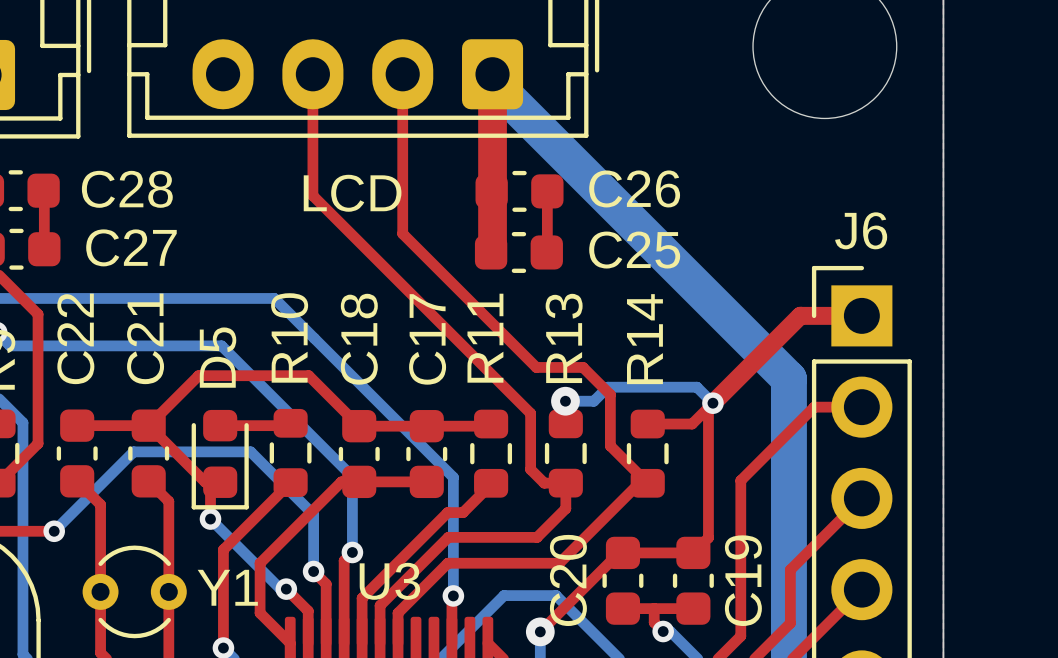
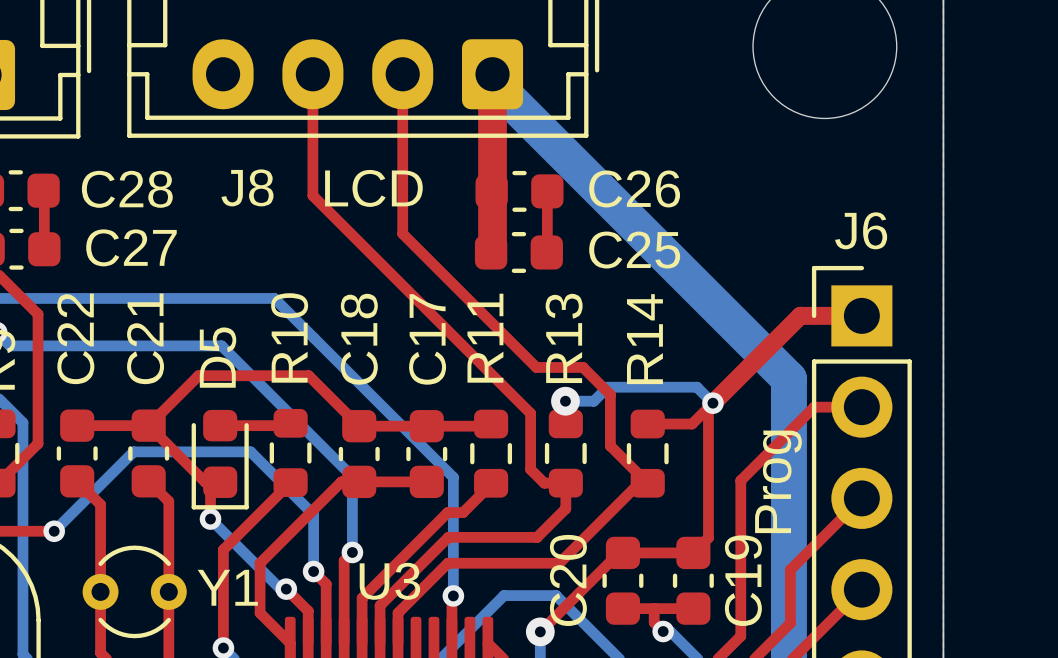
text: none -> LCD (373, 188)
LCD name: LCD (352, 193) -> J8 (247, 187)
text: none -> Prog (778, 481)

